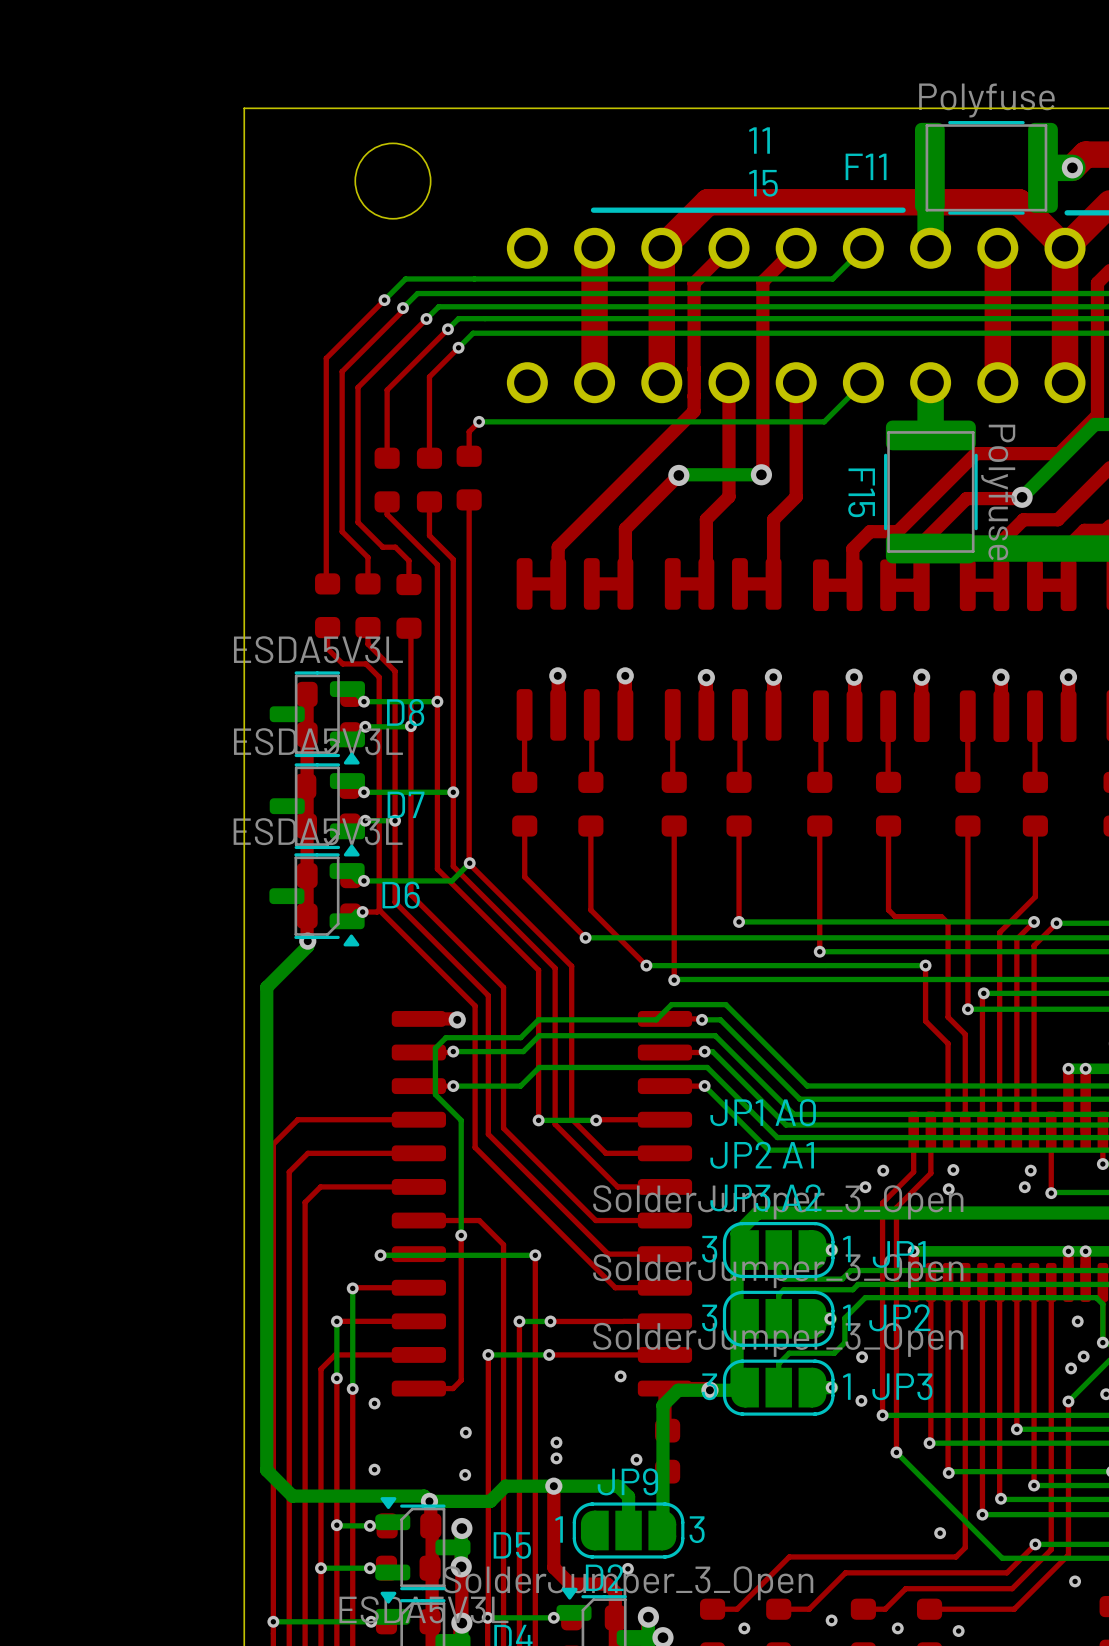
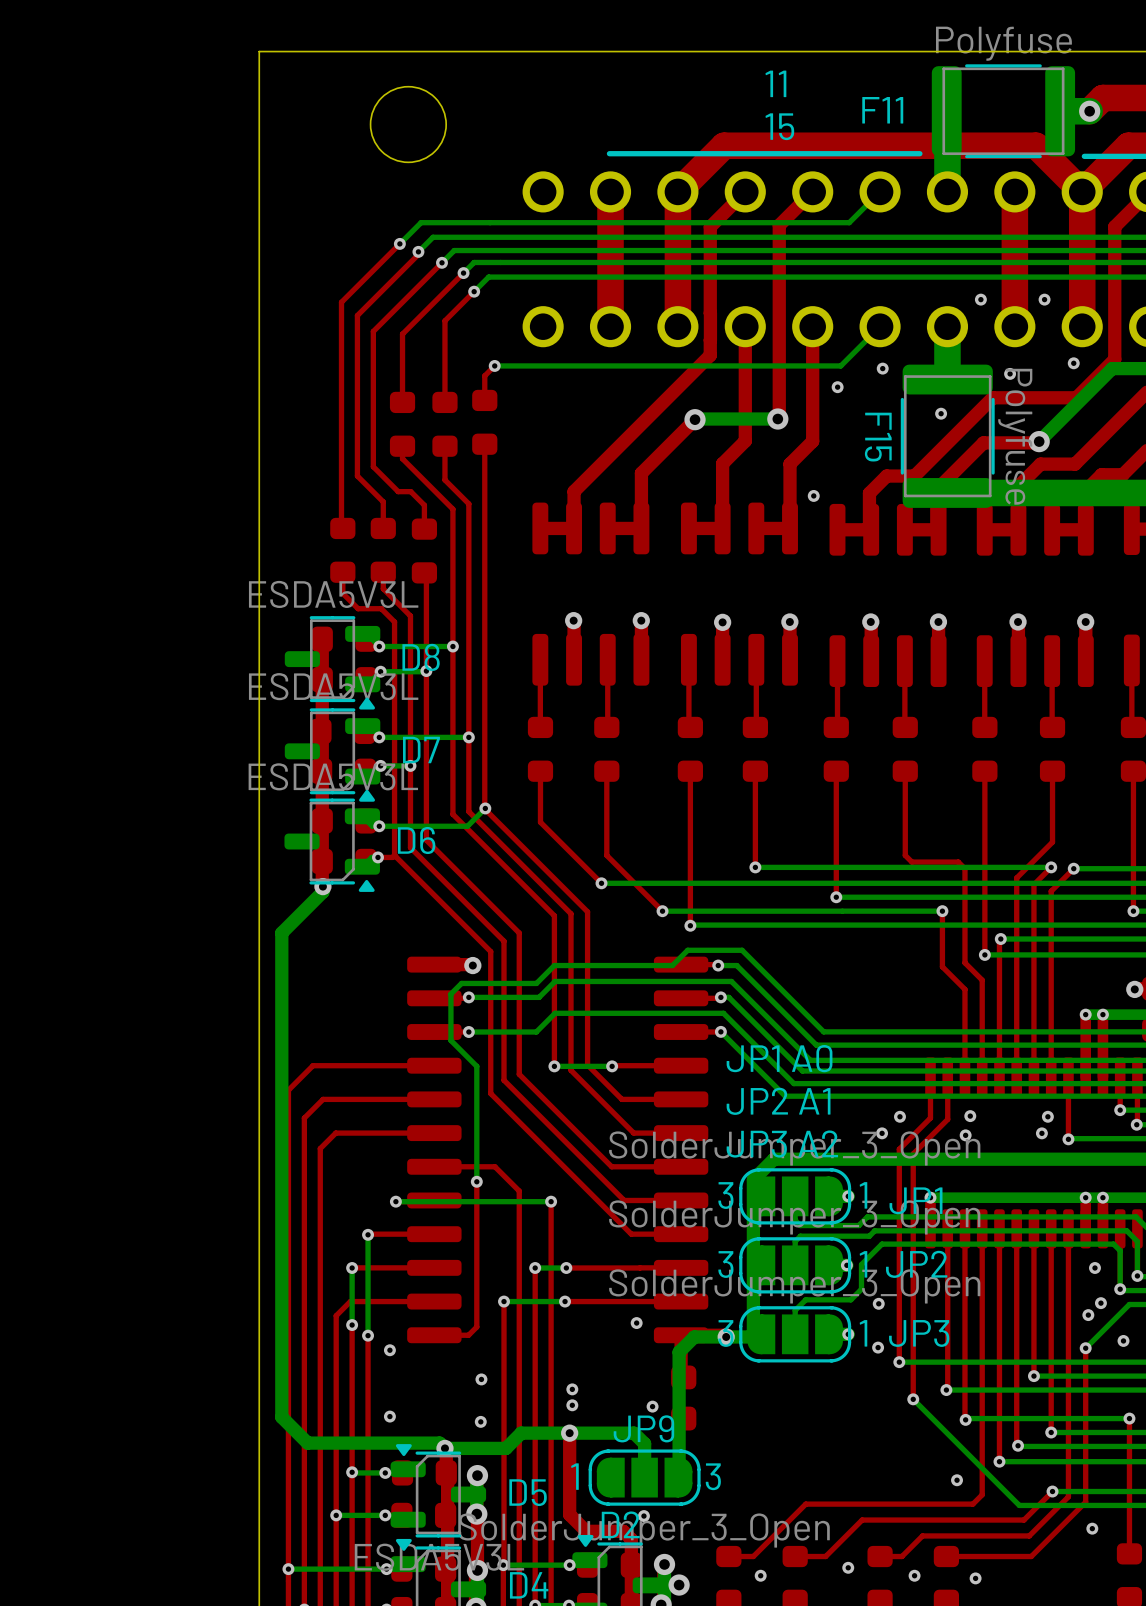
via: none -> (980, 299)
via: none -> (1044, 299)
via: none -> (1073, 363)
via: none -> (882, 368)
via: none -> (1010, 373)
via: none -> (837, 387)
via: none -> (941, 413)
via: none -> (813, 495)

